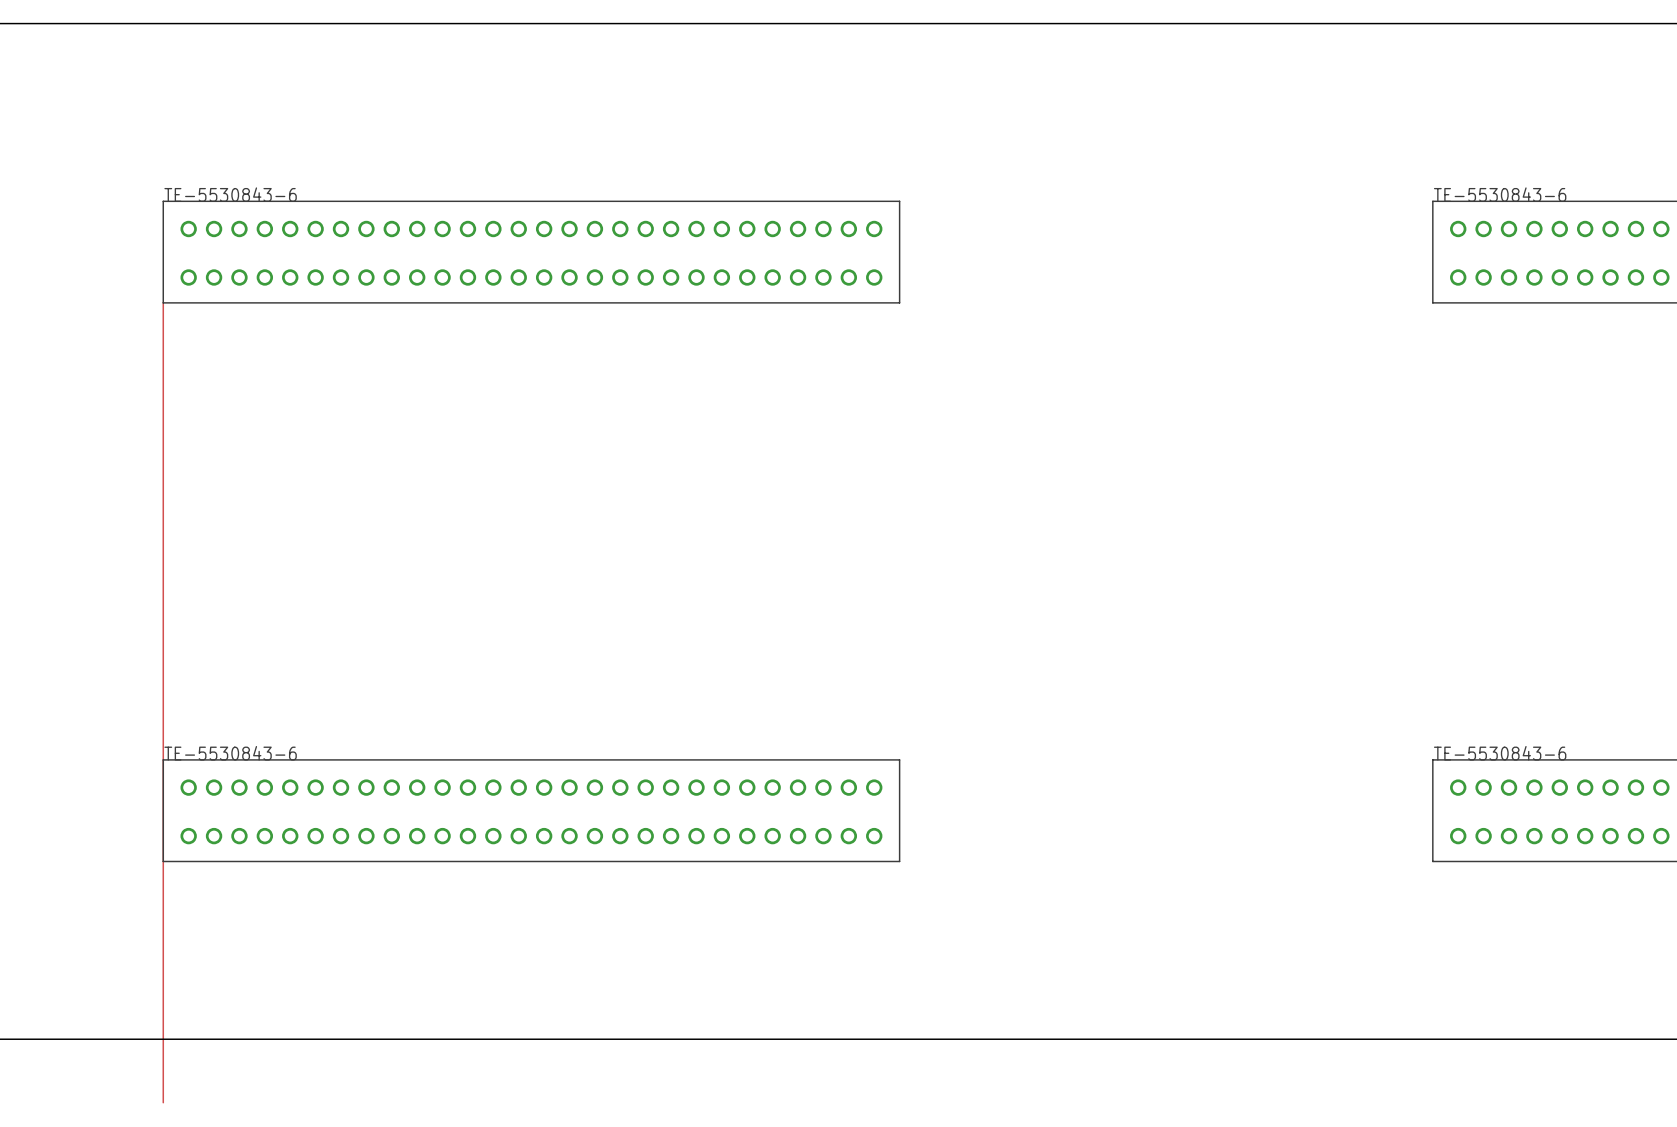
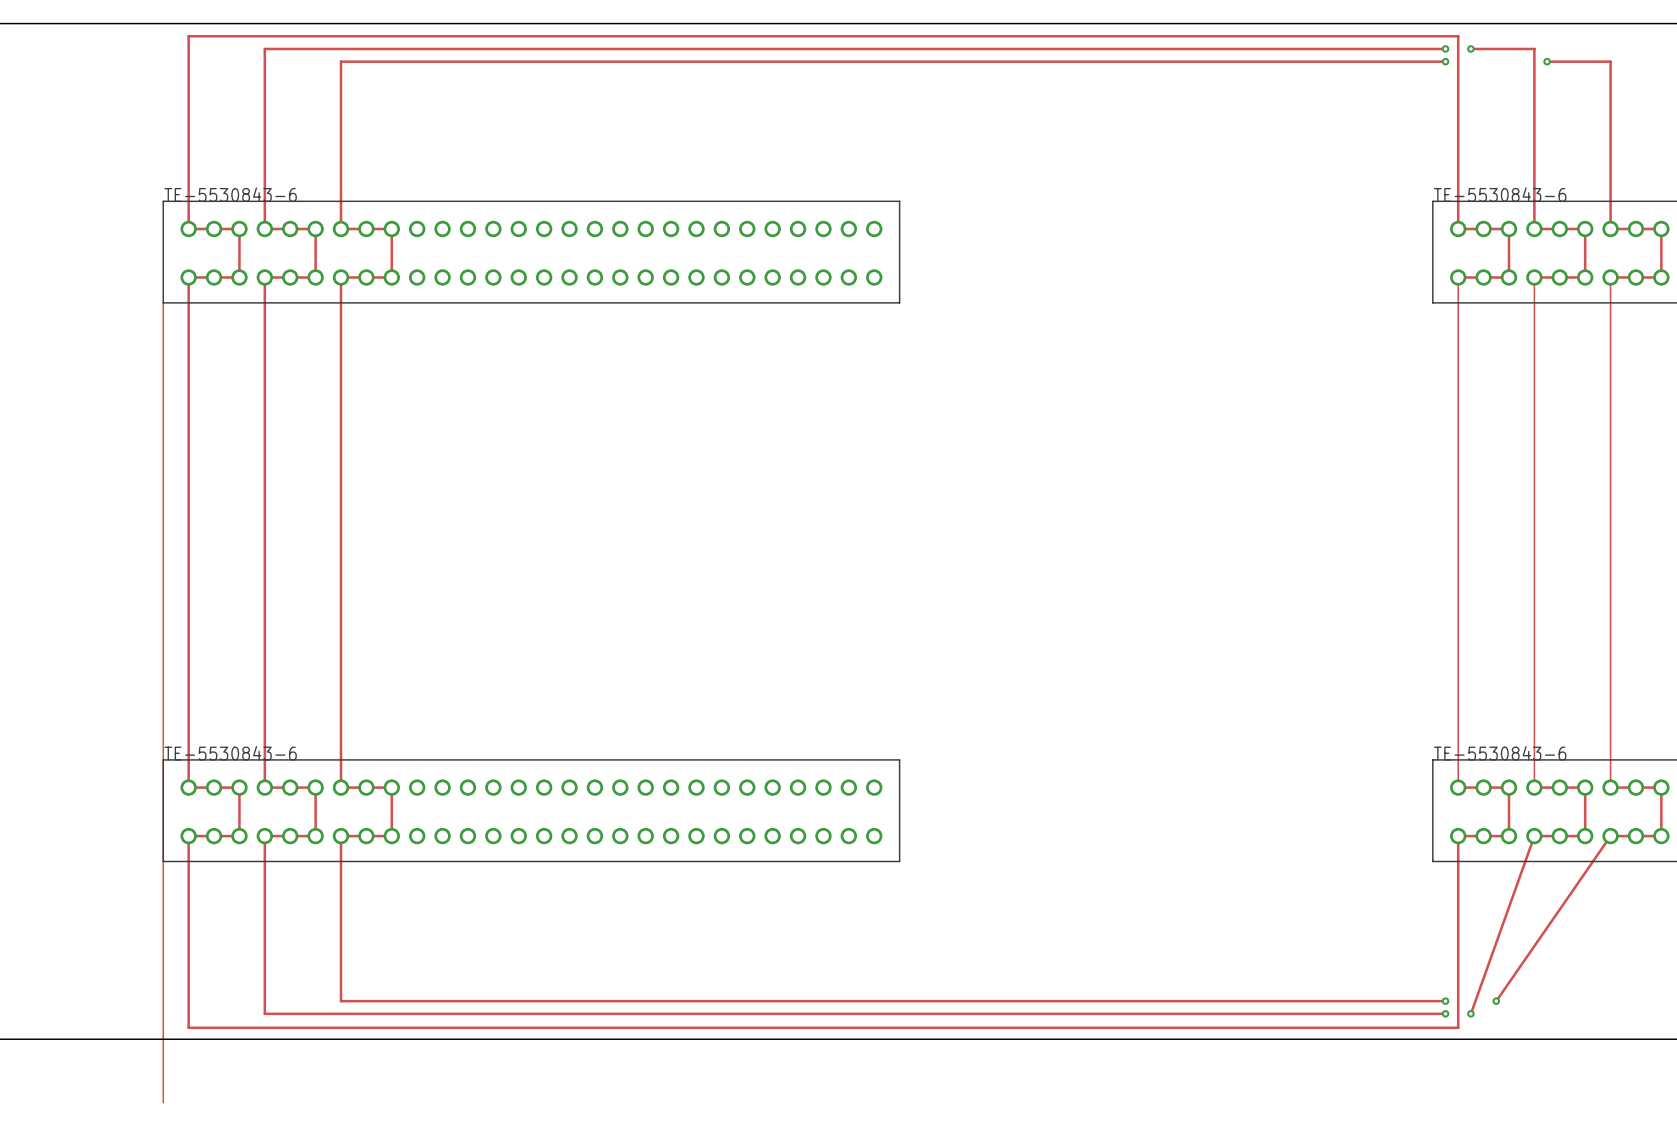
track: none -> (188, 36) (188, 228) (239, 228) (239, 277) (188, 277) (188, 787) (239, 787) (239, 836) (188, 836) (188, 1027) (1458, 1027) (1458, 836) (1509, 836) (1509, 787) (1458, 787) (1458, 277) (1509, 277) (1509, 228) (1458, 228) (1458, 36) (188, 36)
track: none -> (1445, 48) (264, 48) (264, 228) (315, 228) (315, 277) (264, 277) (264, 787) (315, 787) (315, 836) (264, 836) (264, 1013) (1445, 1013)
via: none -> (1445, 48)
track: none -> (1470, 48) (1534, 48) (1534, 228) (1585, 228) (1585, 277) (1534, 277) (1534, 787) (1585, 787) (1585, 836) (1534, 836) (1470, 1013)
via: none -> (1470, 48)
track: none -> (1445, 61) (341, 61) (341, 228) (391, 228) (391, 277) (341, 277) (341, 787) (391, 787) (391, 836) (341, 836) (341, 1001) (1445, 1001)
via: none -> (1445, 61)
track: none -> (1547, 61) (1610, 61) (1610, 228) (1661, 228) (1661, 277) (1610, 277) (1610, 787) (1661, 787) (1661, 836) (1610, 836) (1496, 1001)
via: none -> (1547, 61)
via: none -> (1445, 1001)
via: none -> (1496, 1001)
via: none -> (1445, 1013)
via: none -> (1470, 1013)

